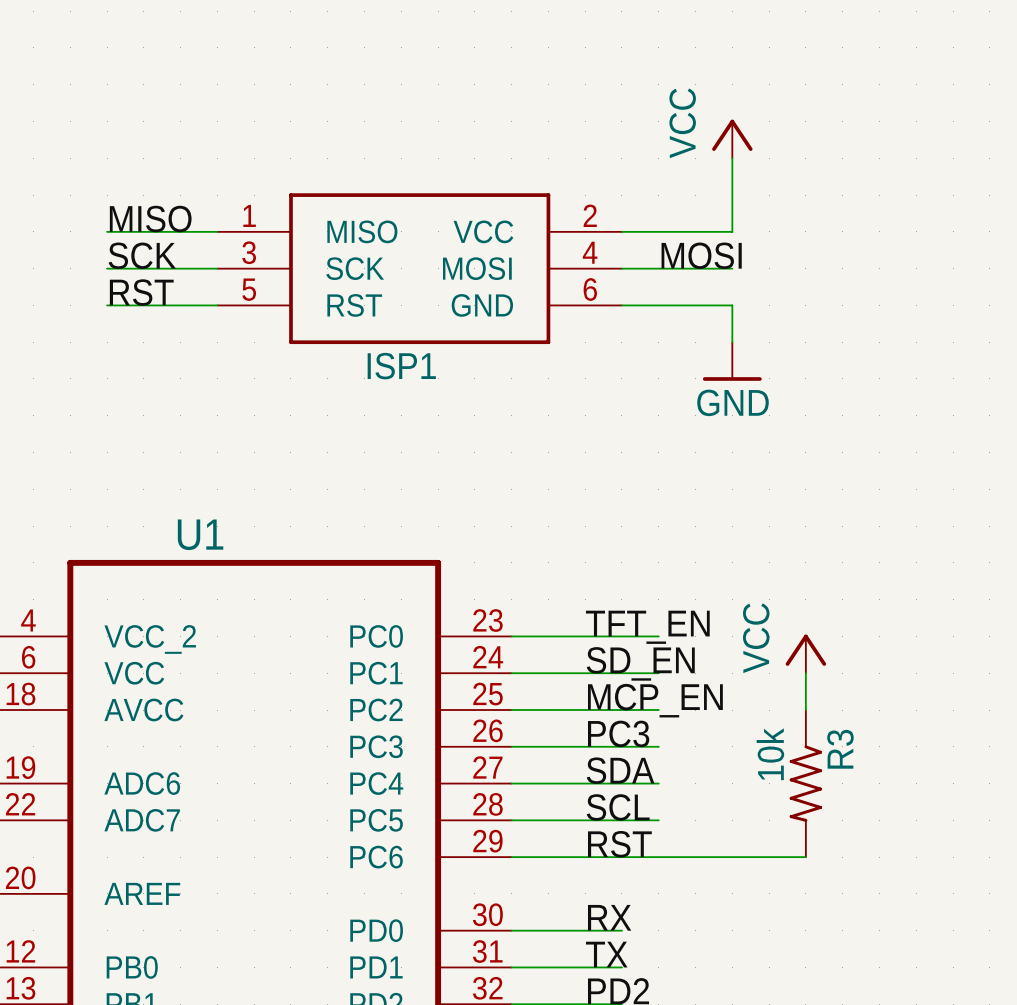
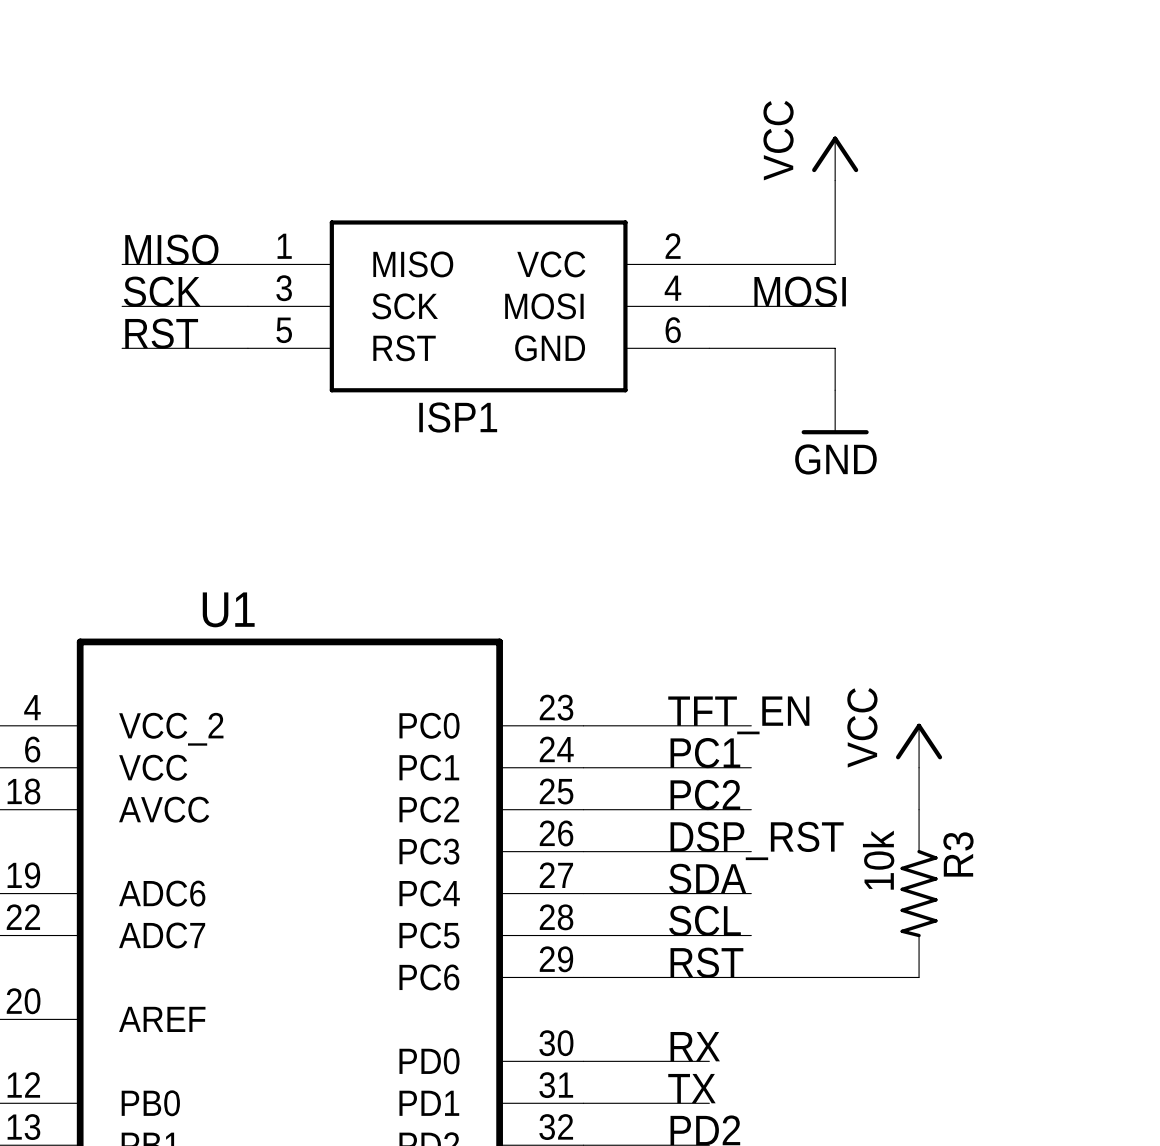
label: SD_EN (640, 663) -> PC1 (705, 753)
label: MCP_EN (655, 700) -> PC2 (705, 795)
label: PC3 (618, 733) -> DSP_RST (757, 840)

